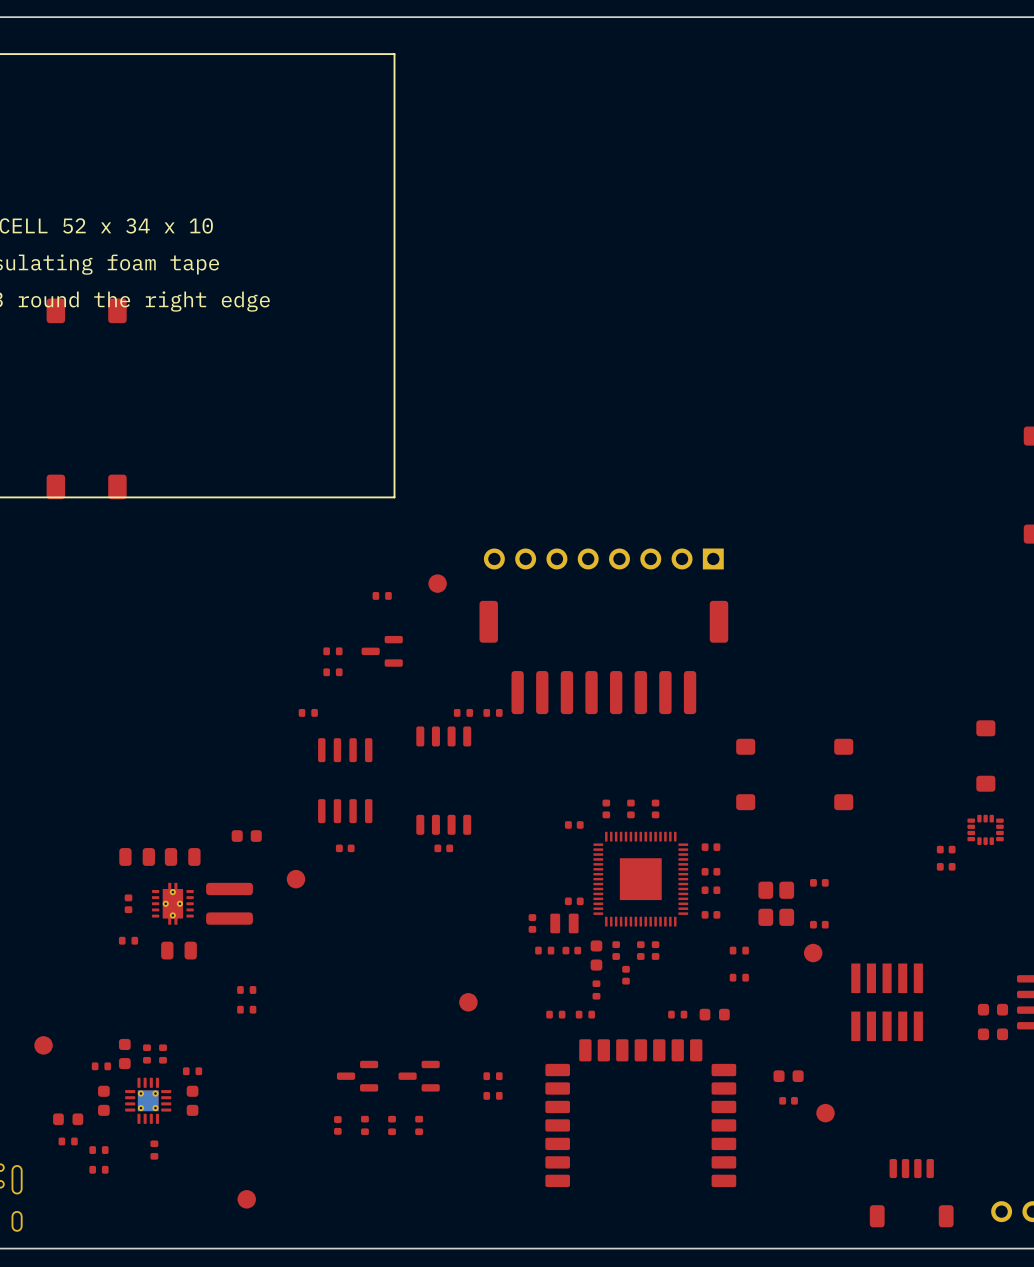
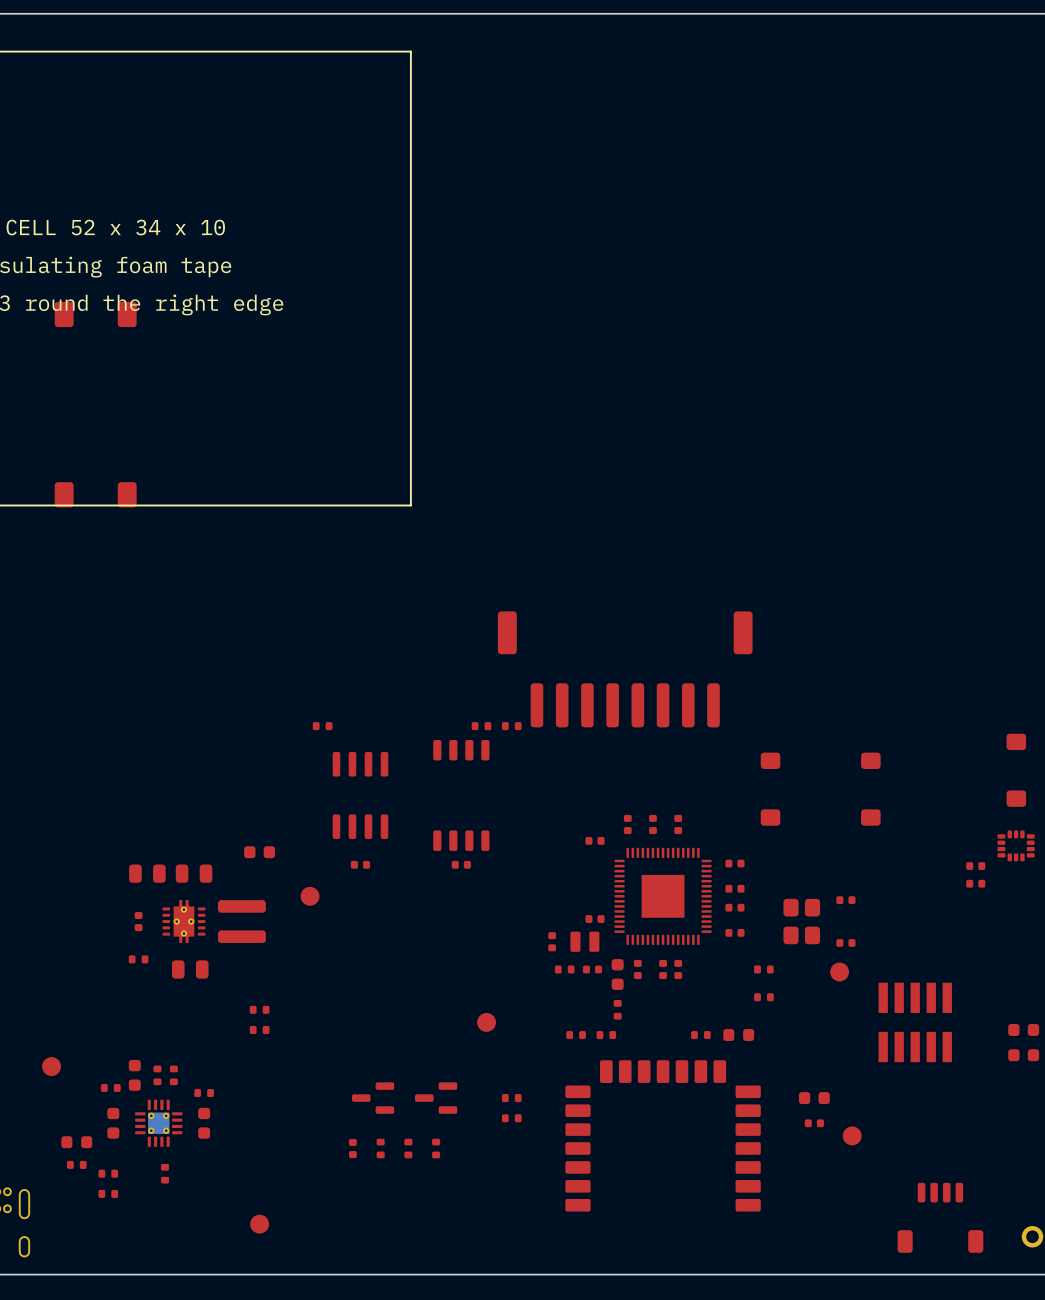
part: (603, 558) -> none
part: (437, 583) -> none
part: (382, 595) -> none
part: (332, 651) -> none
part: (382, 651) -> none
part: (332, 672) -> none
part: (626, 975) -> none

